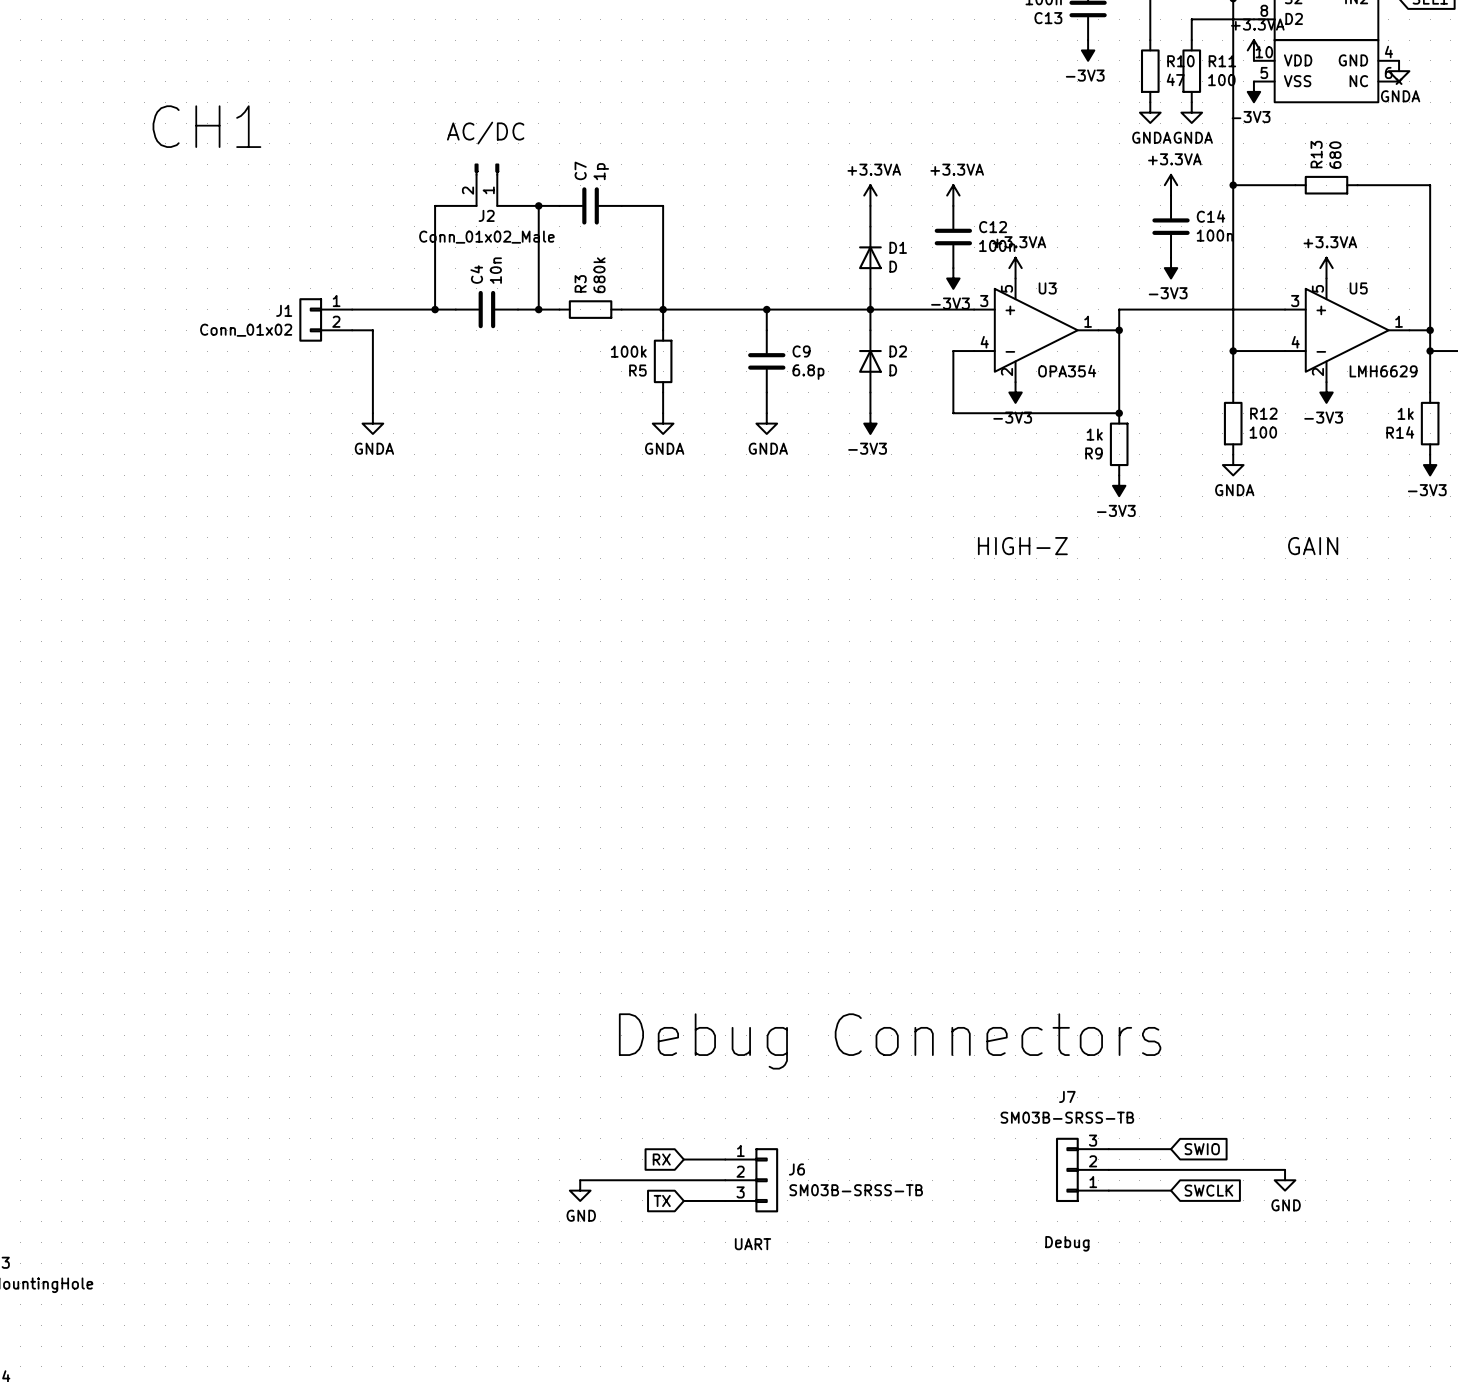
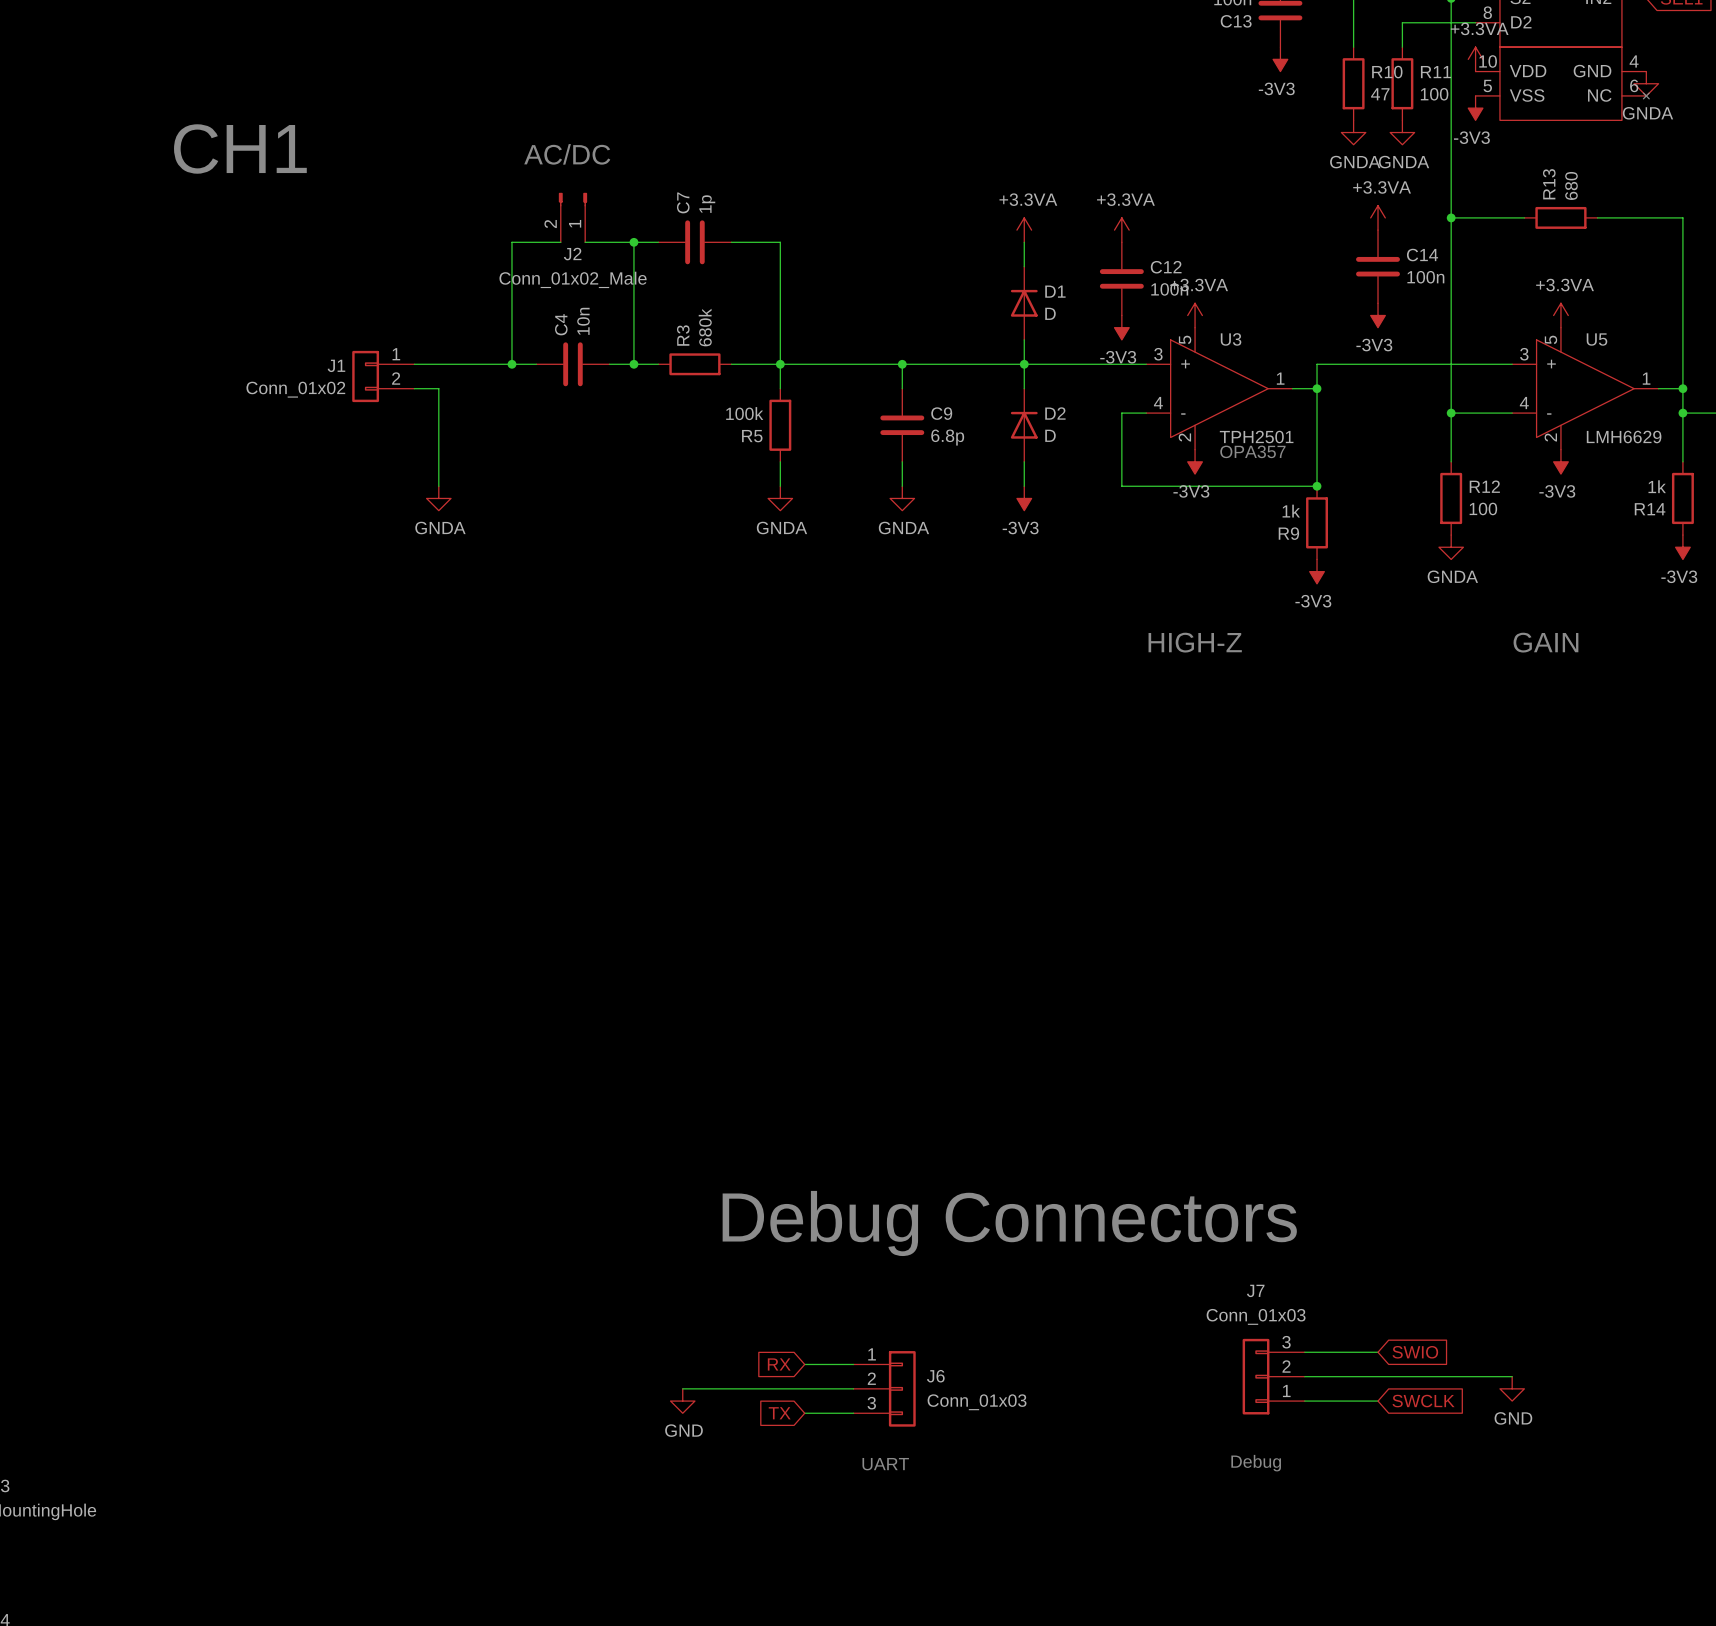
U3 value: OPA354 (1067, 371) -> TPH2501 (1256, 437)
text: none -> OPA357 (1252, 451)
J7 value: SM03B-SRSS-TB (1067, 1117) -> Conn_01x03 (1256, 1316)
J6 value: SM03B-SRSS-TB (856, 1190) -> Conn_01x03 (977, 1402)

